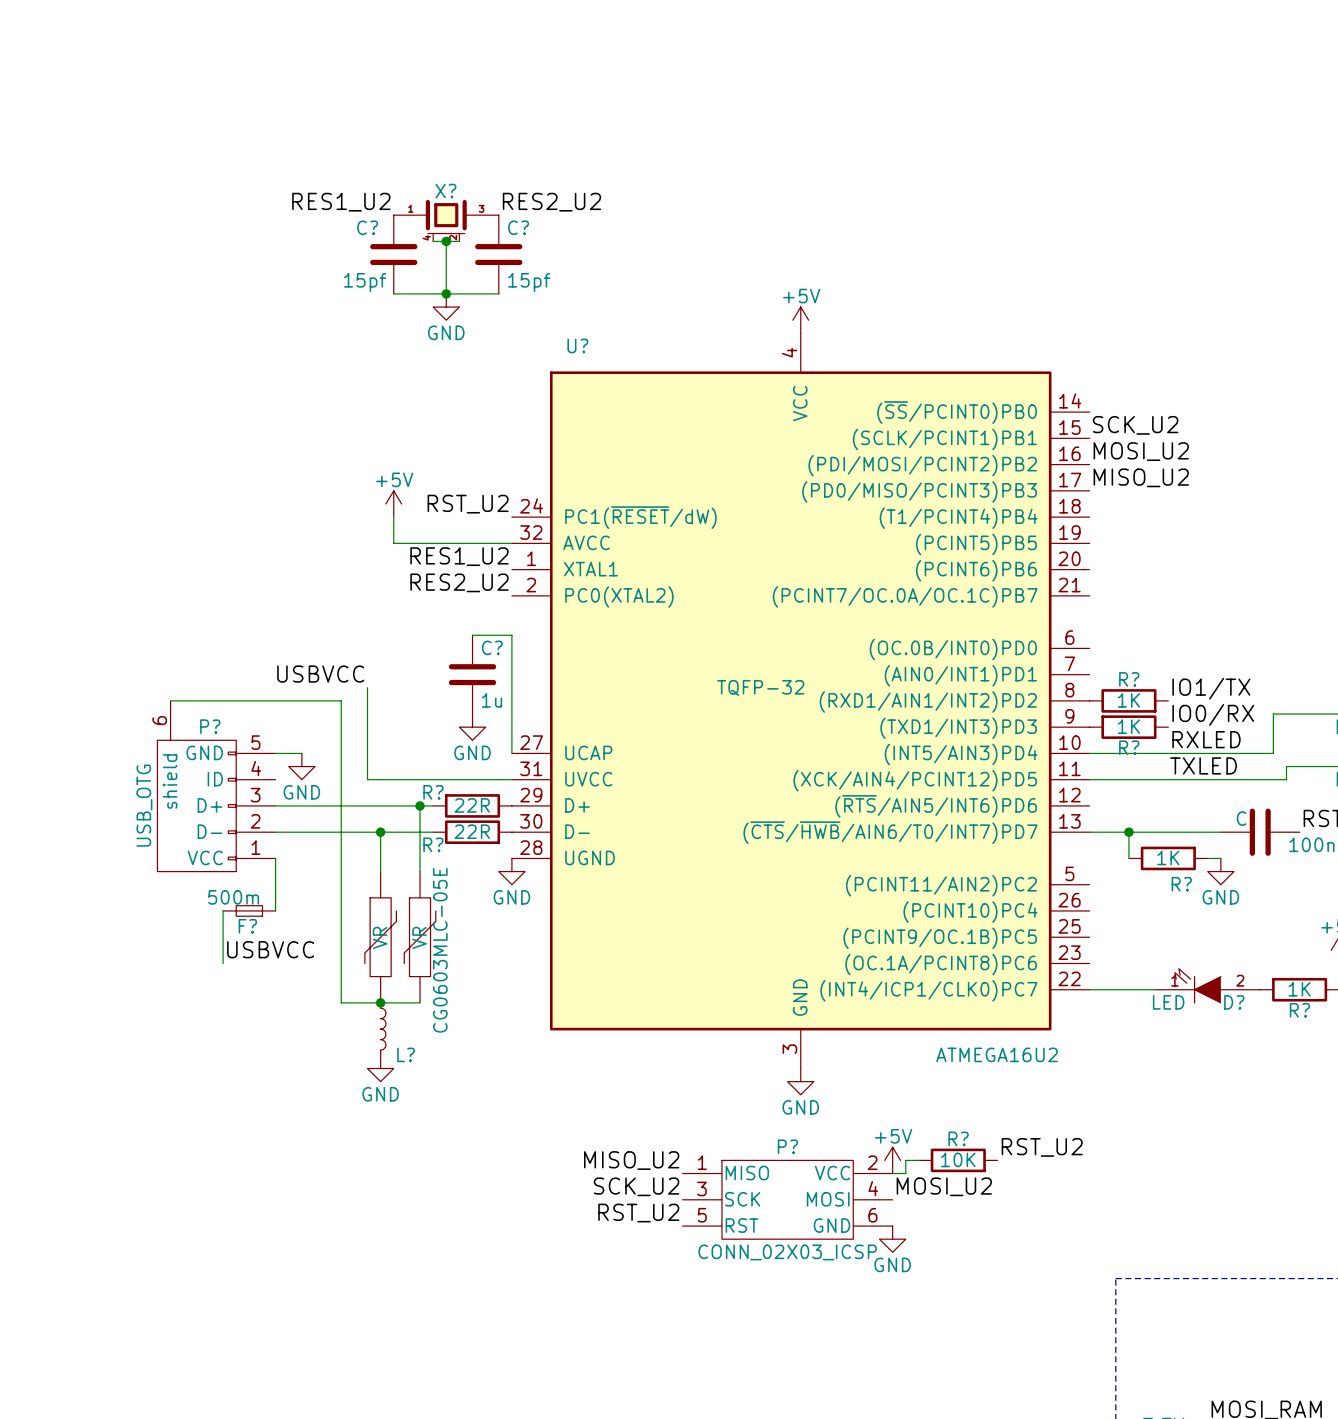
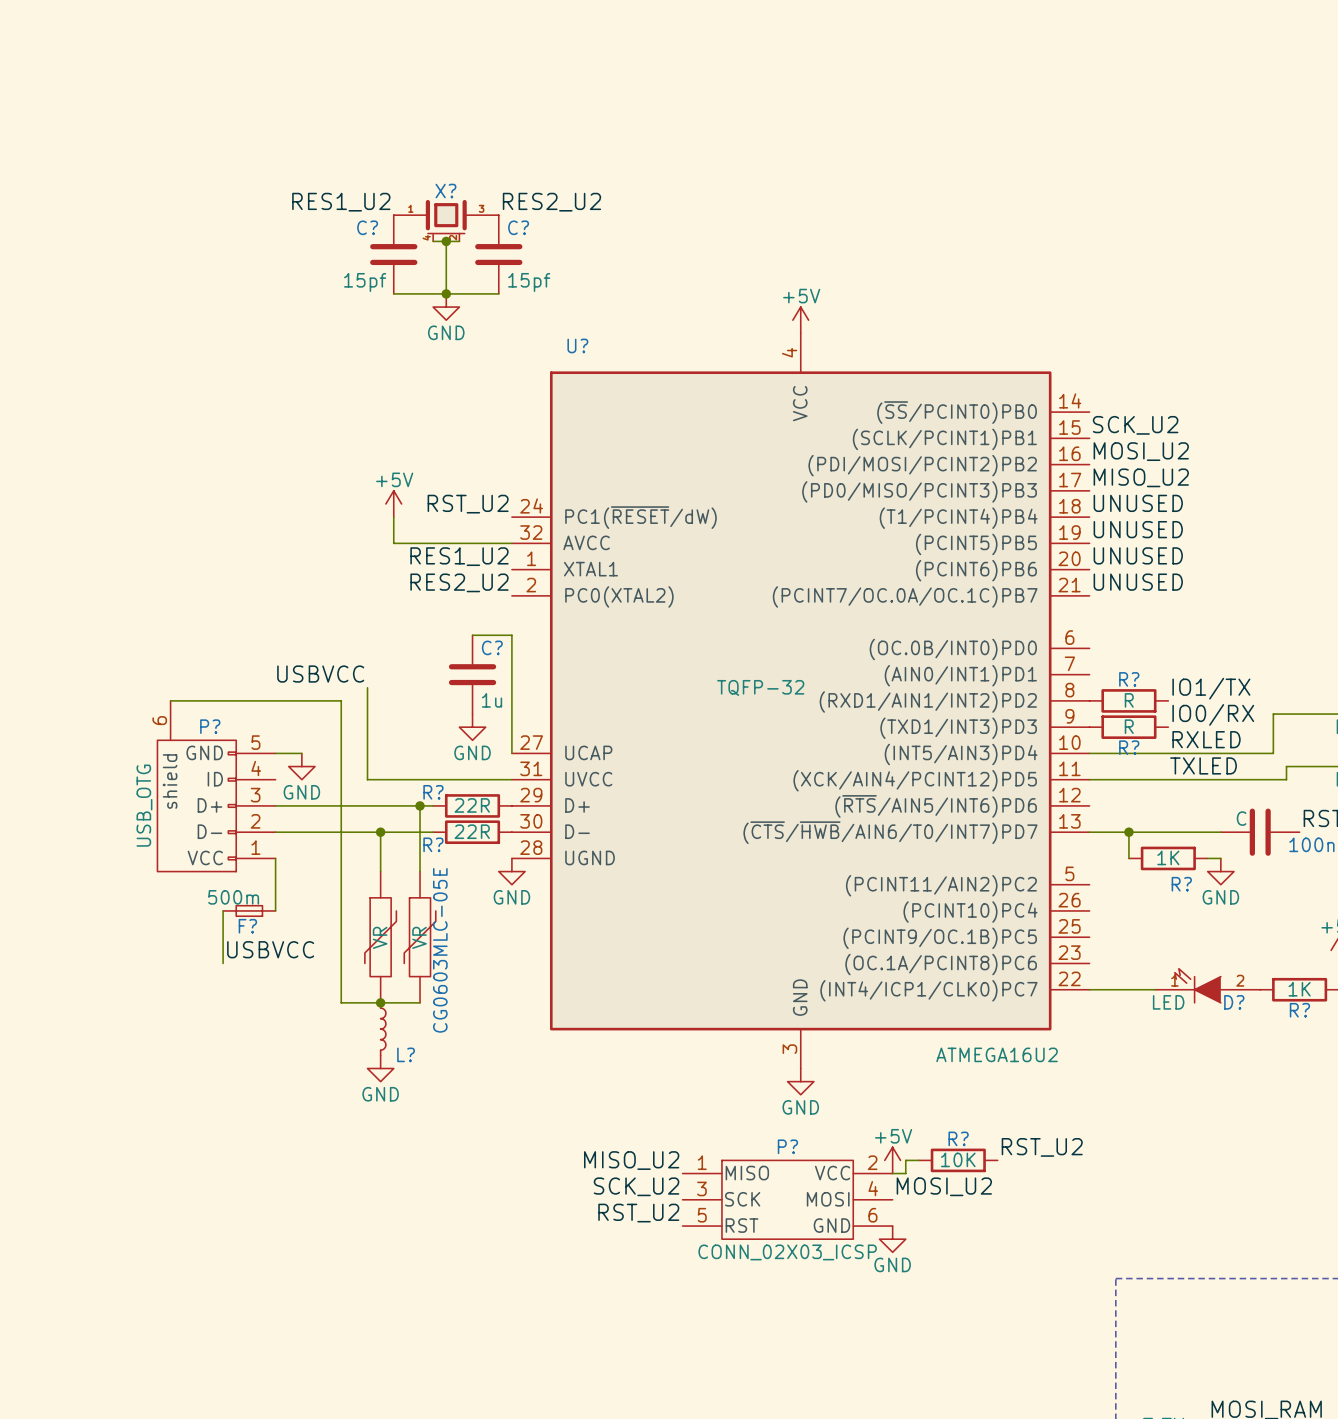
label: none -> UNUSED (1138, 503)
label: none -> UNUSED (1138, 529)
label: none -> UNUSED (1138, 555)
label: none -> UNUSED (1138, 582)
R? value: 1K (1128, 700) -> R (1129, 700)
R? value: 1K (1128, 726) -> R (1129, 726)

